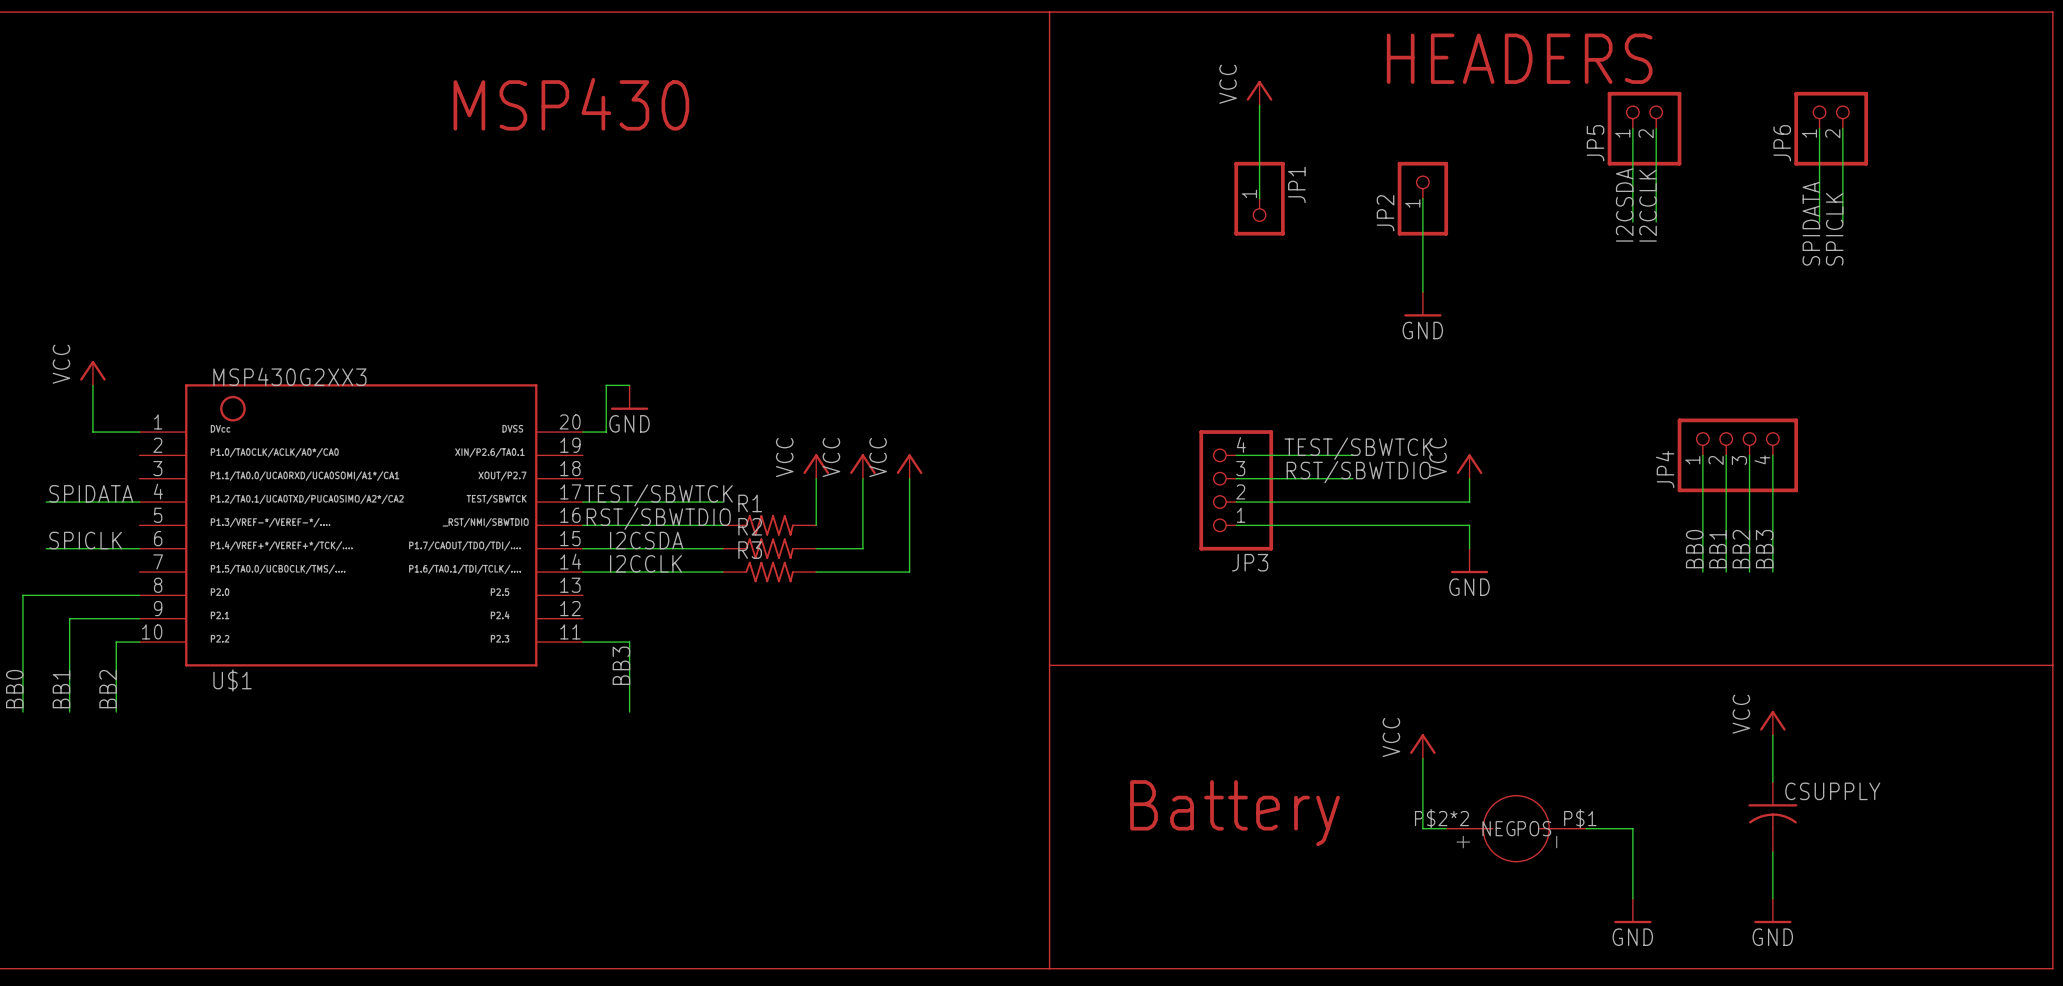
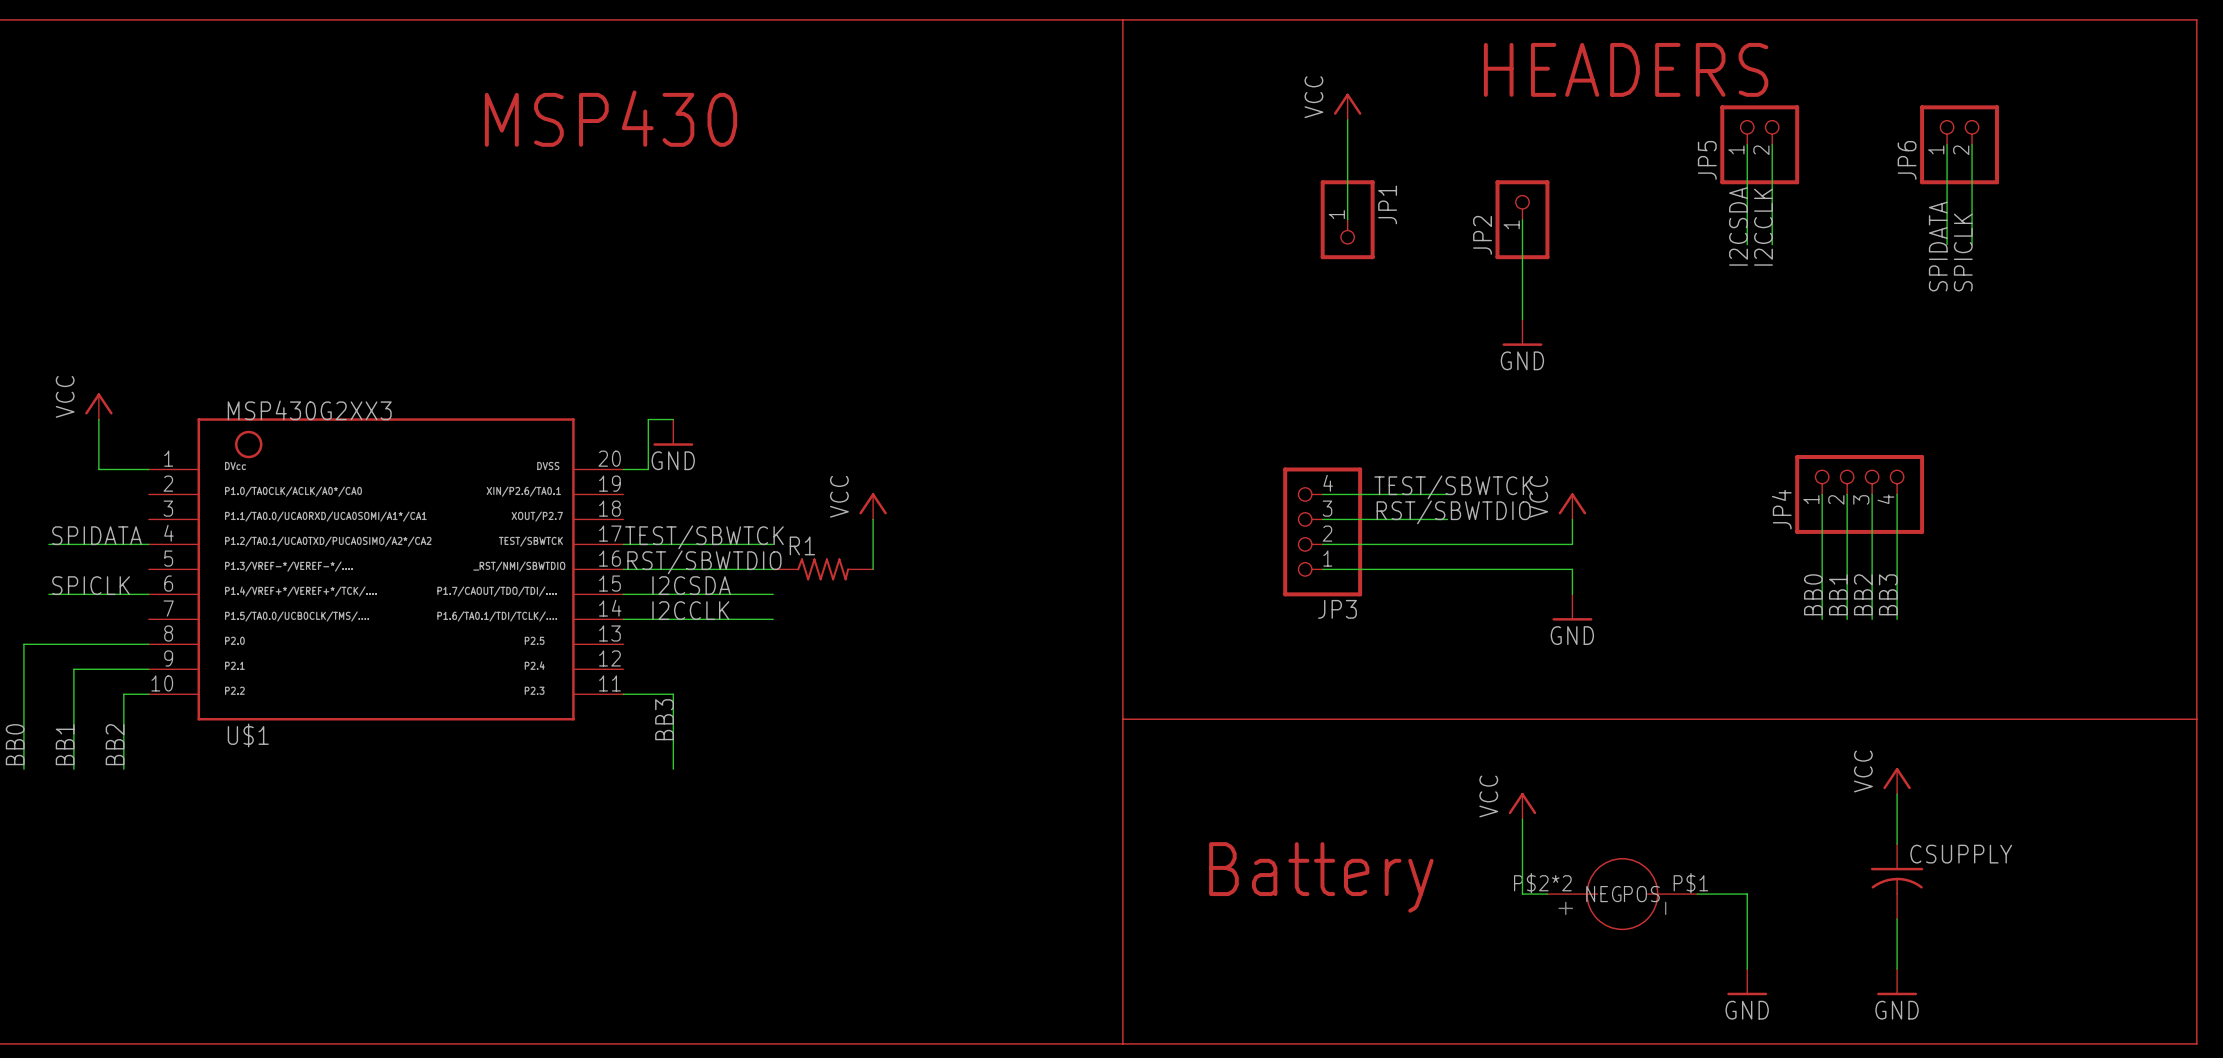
power symbol: VCC (862, 466) -> none
power symbol: VCC (909, 466) -> none
wire: (862, 478) (862, 548) (816, 548) -> none
wire: (909, 478) (909, 572) (816, 572) -> none
R2: (769, 548) -> none
R3: (769, 572) -> none

